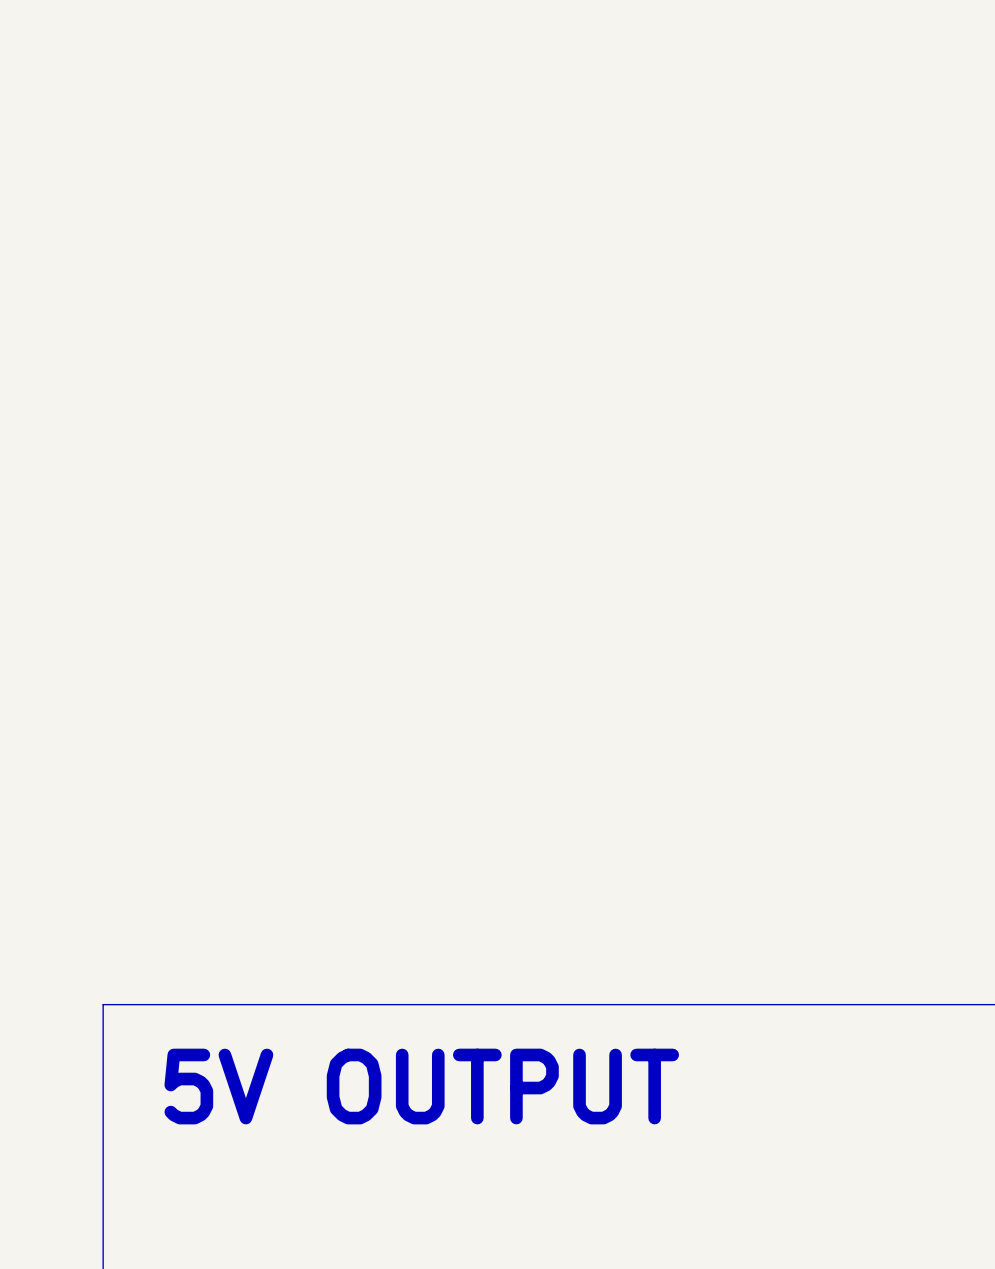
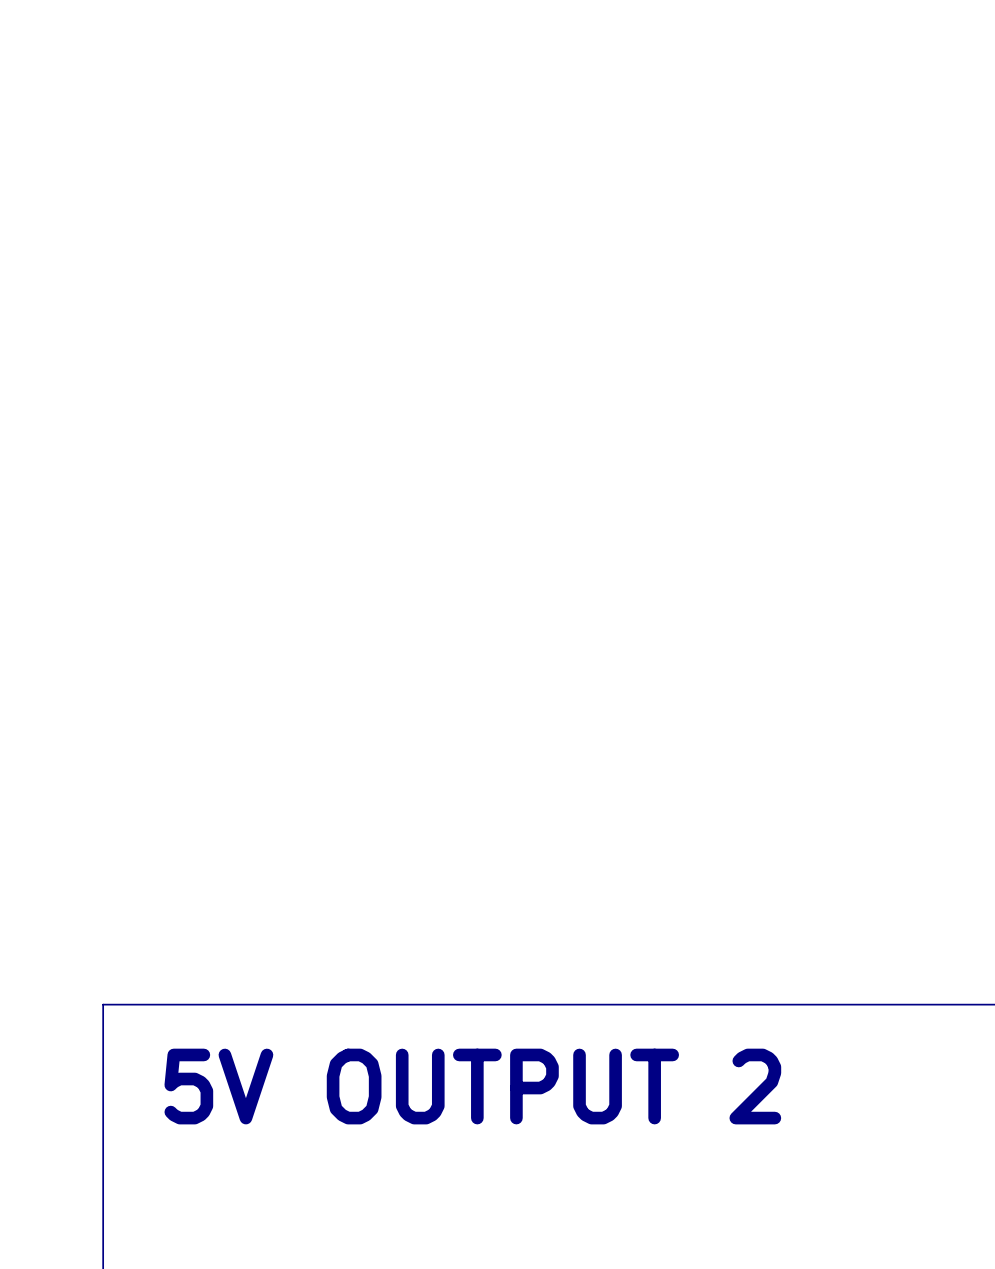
text: 5V OUTPUT (421, 1086) -> 5V OUTPUT 2 (472, 1086)

